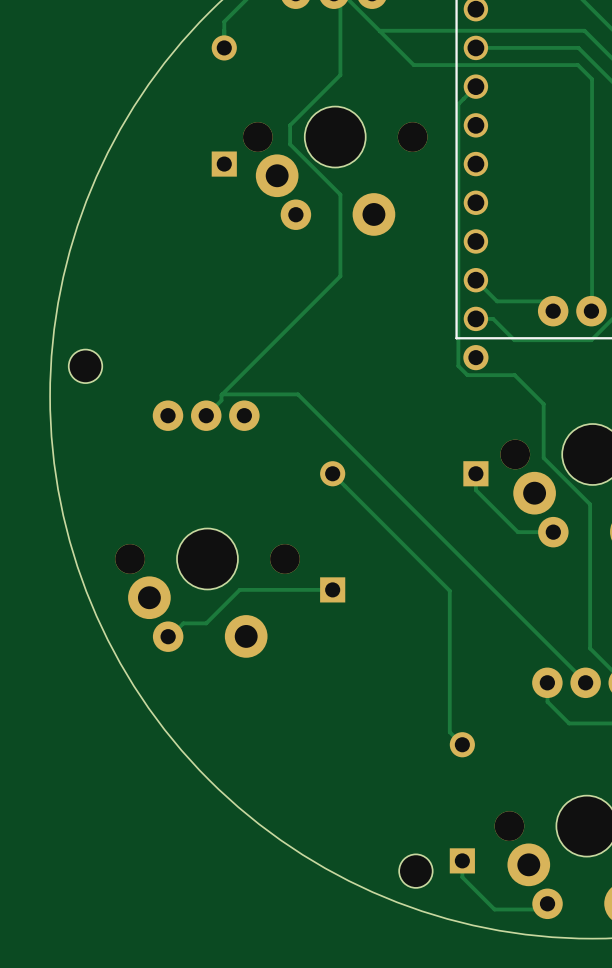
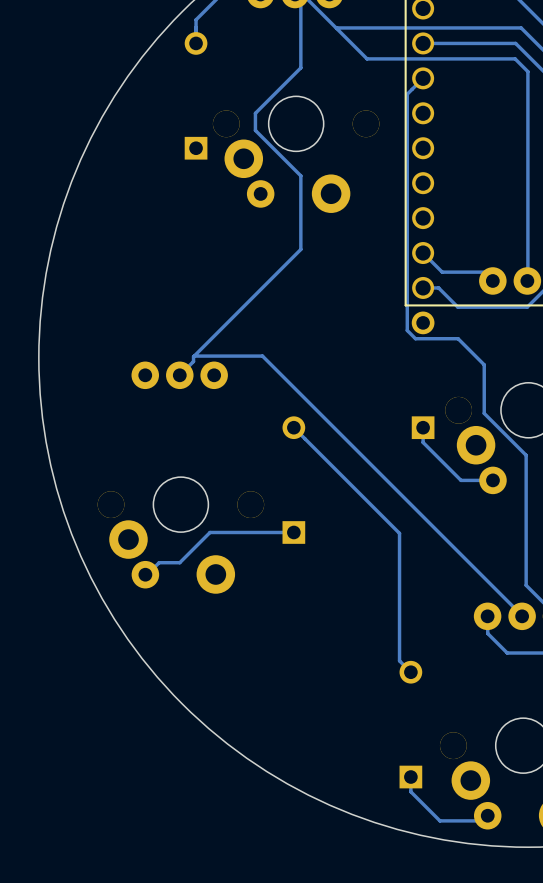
part: (85, 366) -> none
part: (415, 871) -> none

